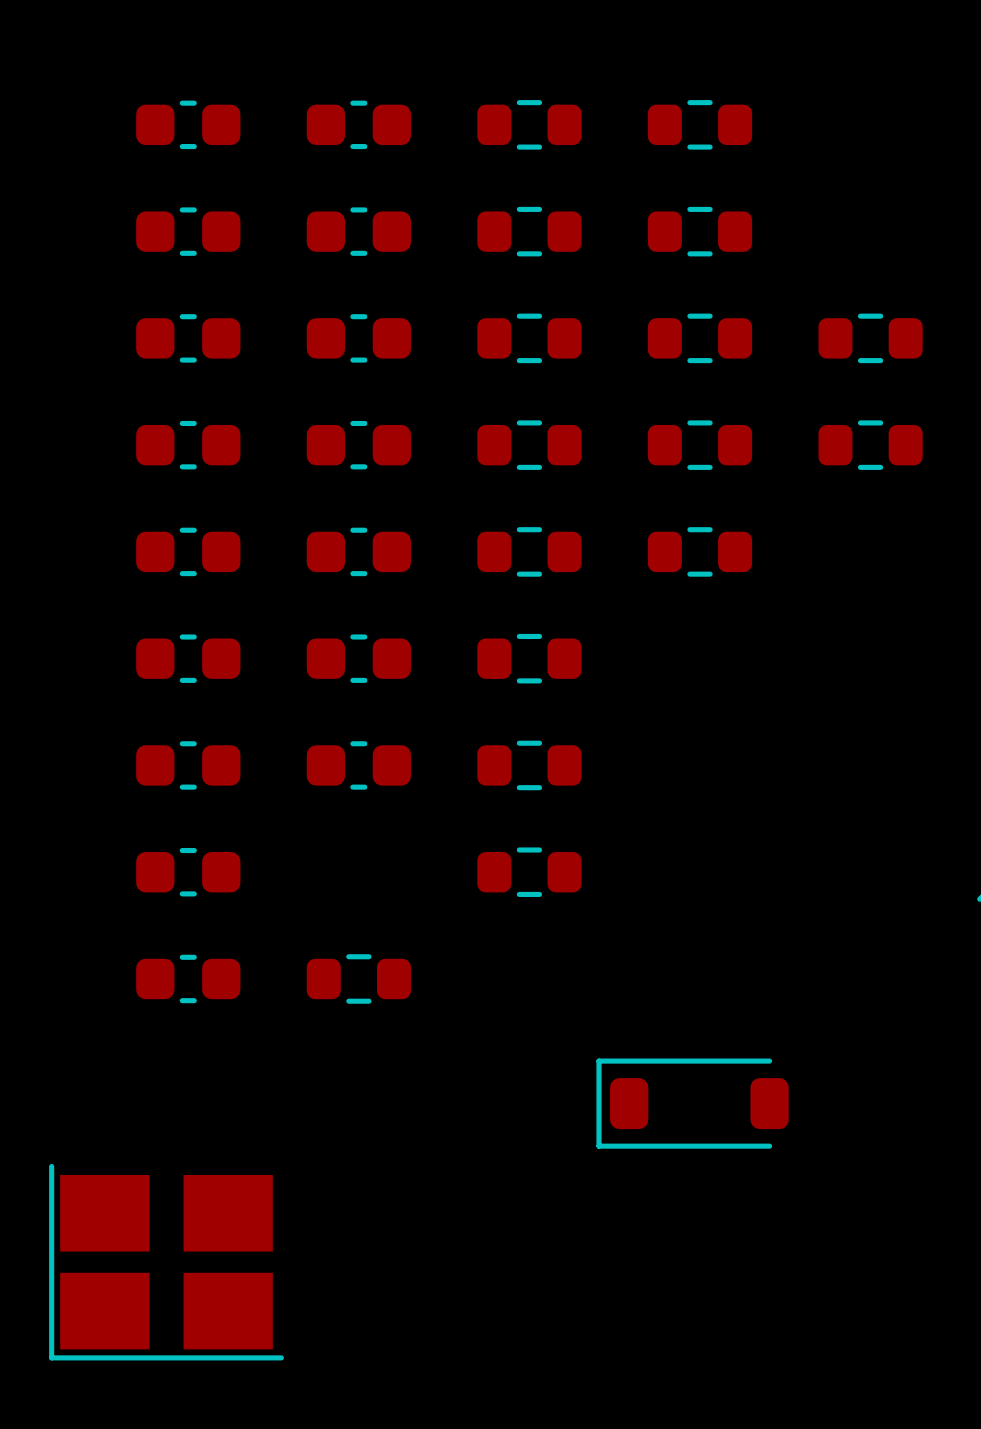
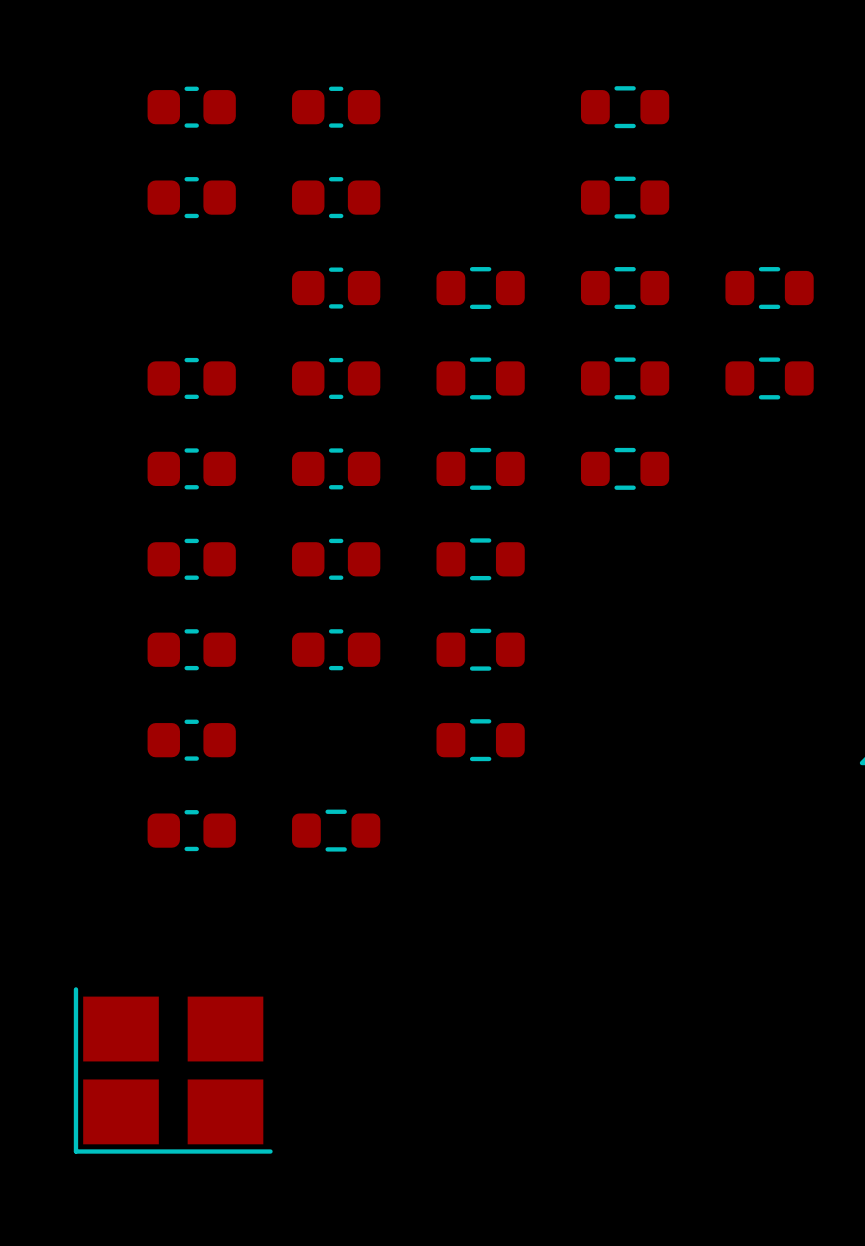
part: (529, 124) -> none
part: (529, 231) -> none
part: (188, 338) -> none
part: (692, 1103) -> none

